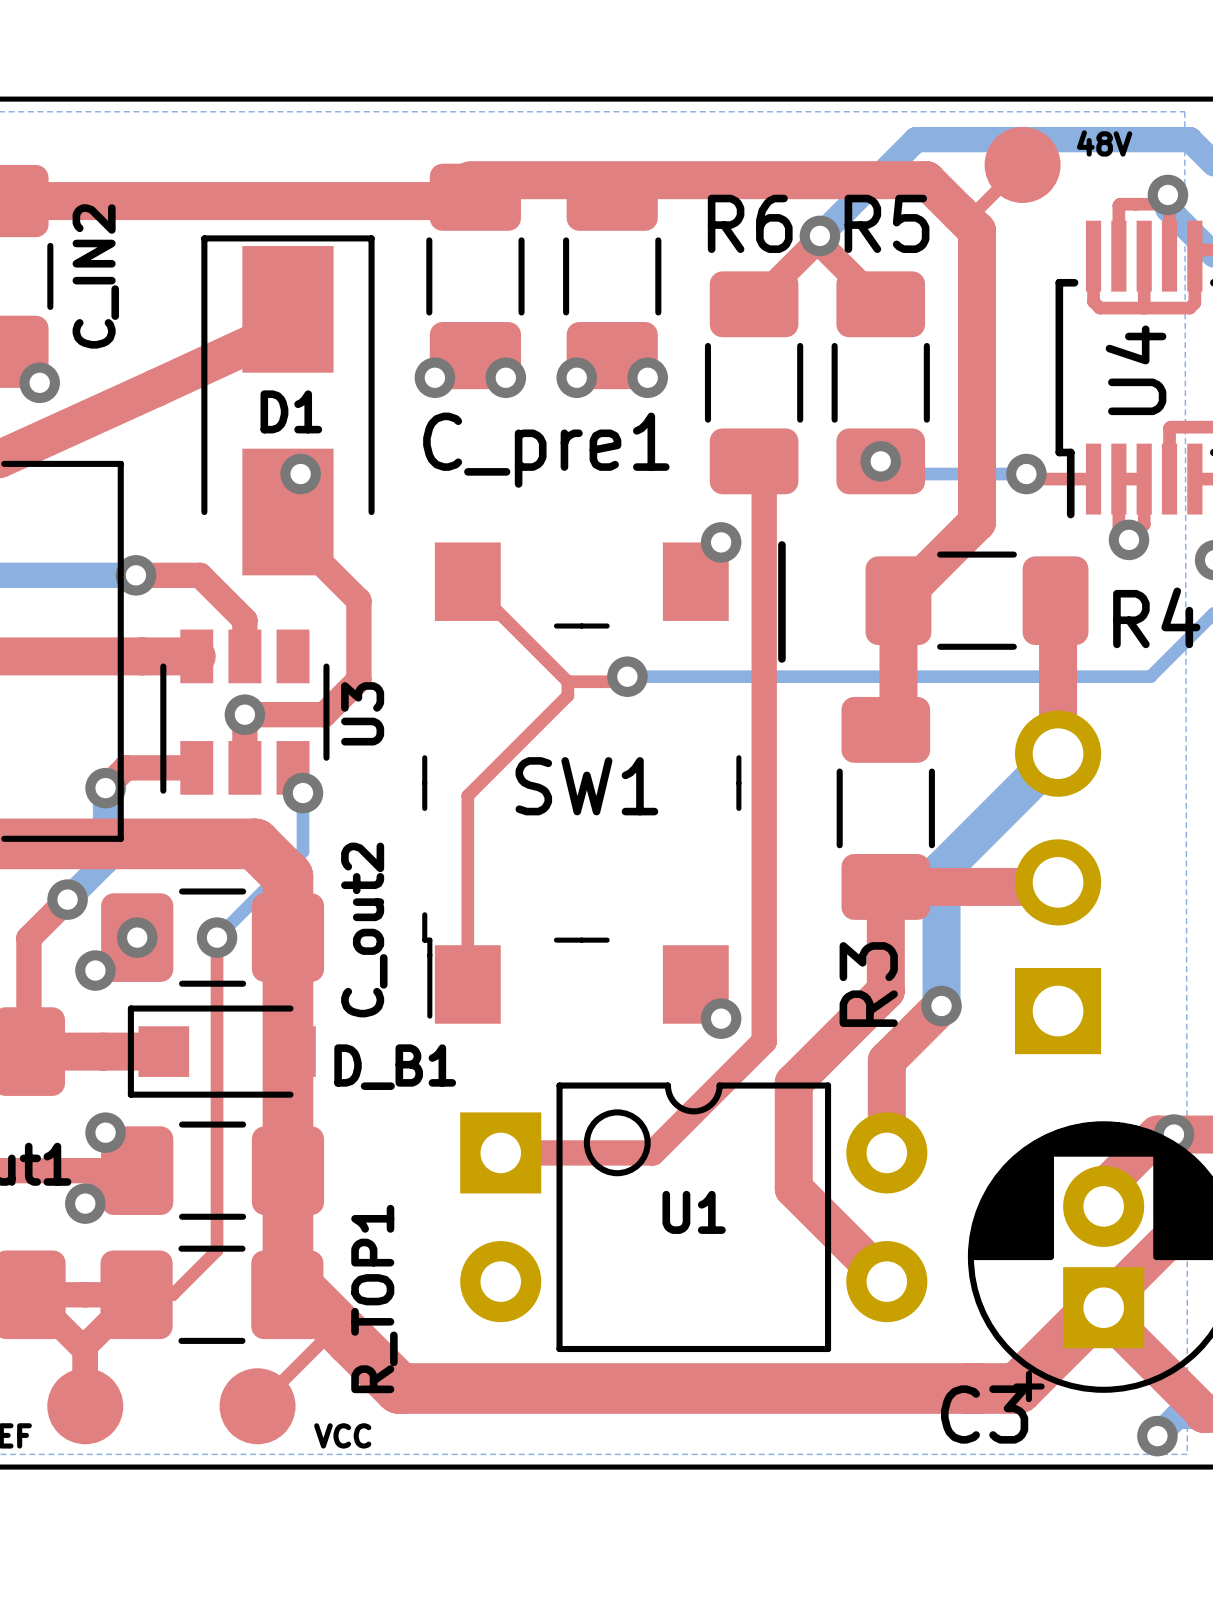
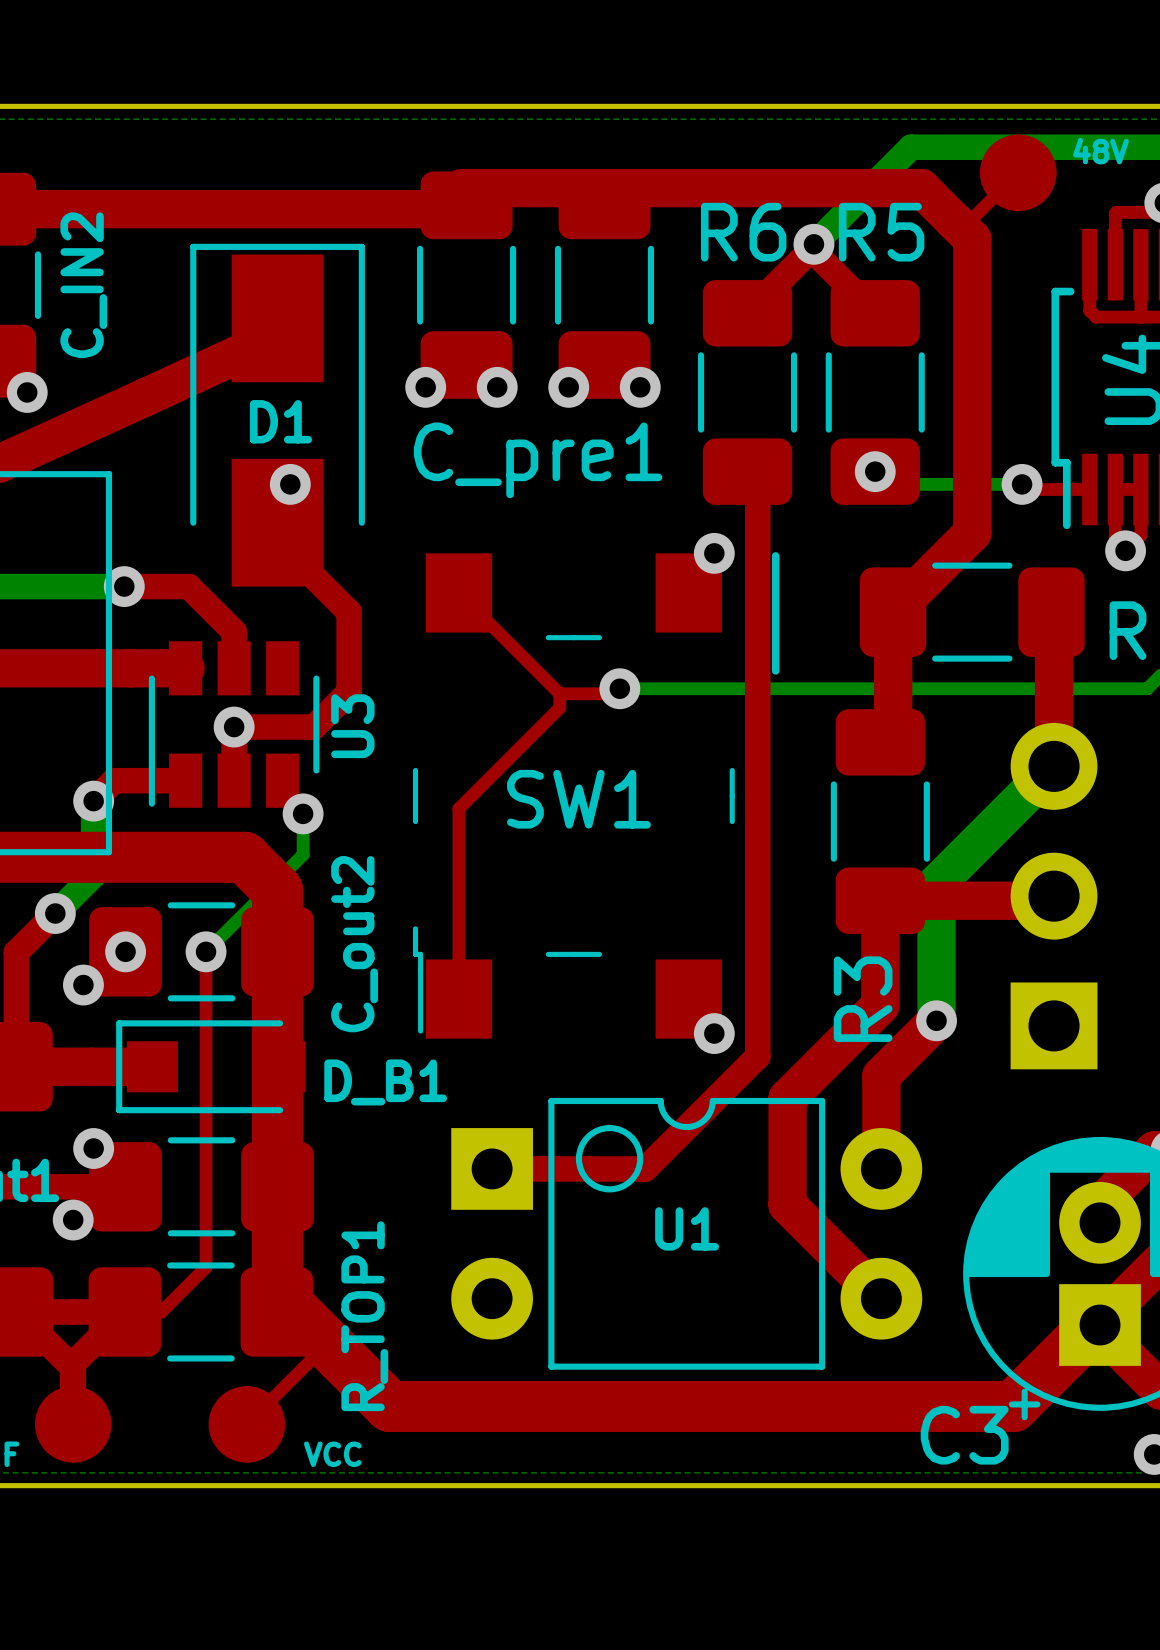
bottom track: (302, 793) (302, 851) -> (303, 813) (303, 854) (292, 865)
via position: (302, 793) -> (303, 813)
C3 name position: C3 (984, 1414) -> C3 (964, 1435)

